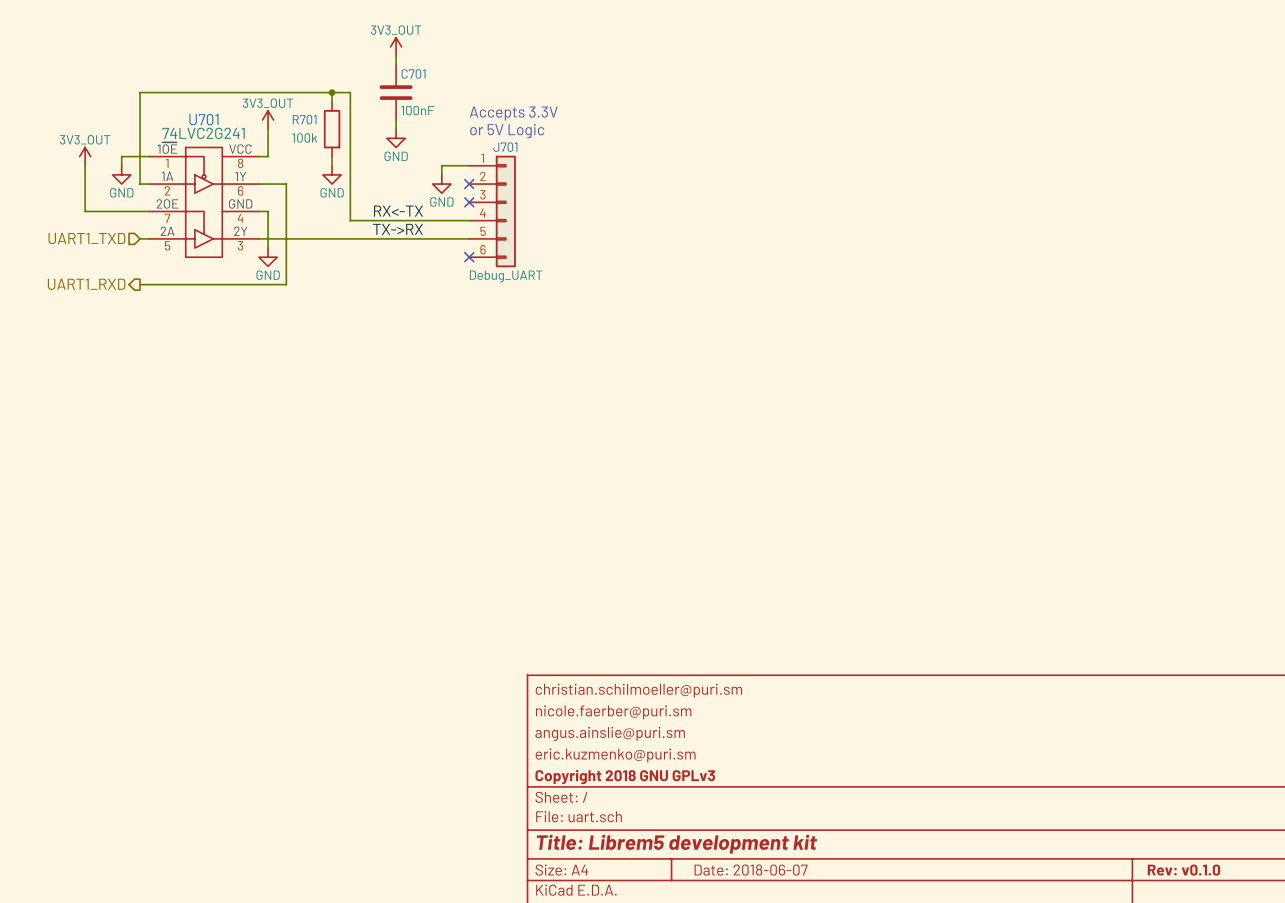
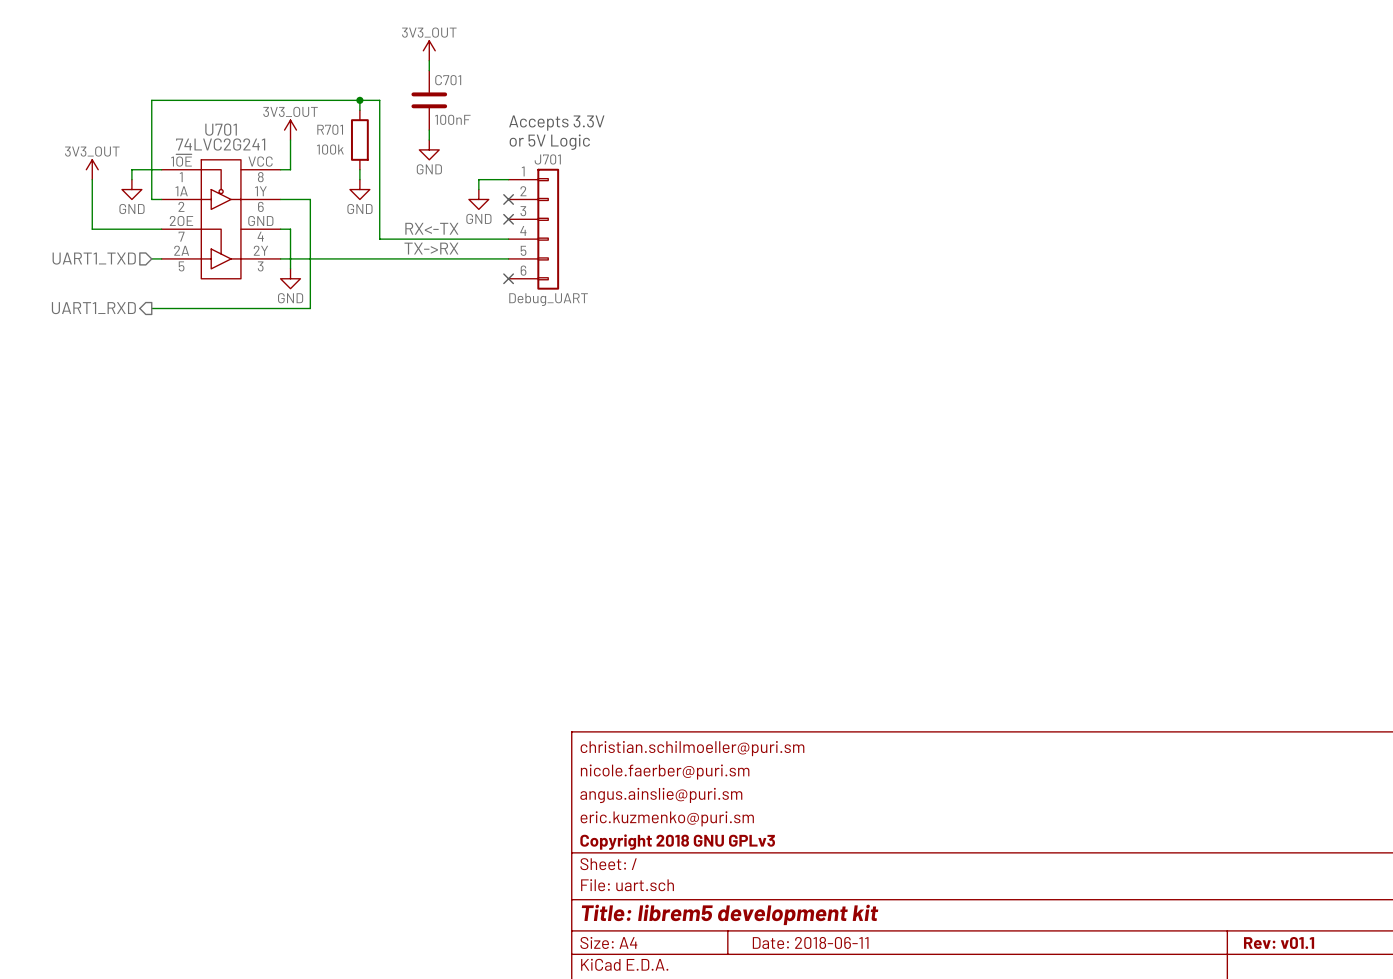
title block: Title: Librem5 development kit (676, 844) -> Title: librem5 development kit (730, 914)
title block: Date: 2018-06-07 (751, 870) -> Date: 2018-06-11 (810, 942)
title block: Rev: v0.1.0 (1183, 870) -> Rev: v01.1 (1279, 942)

